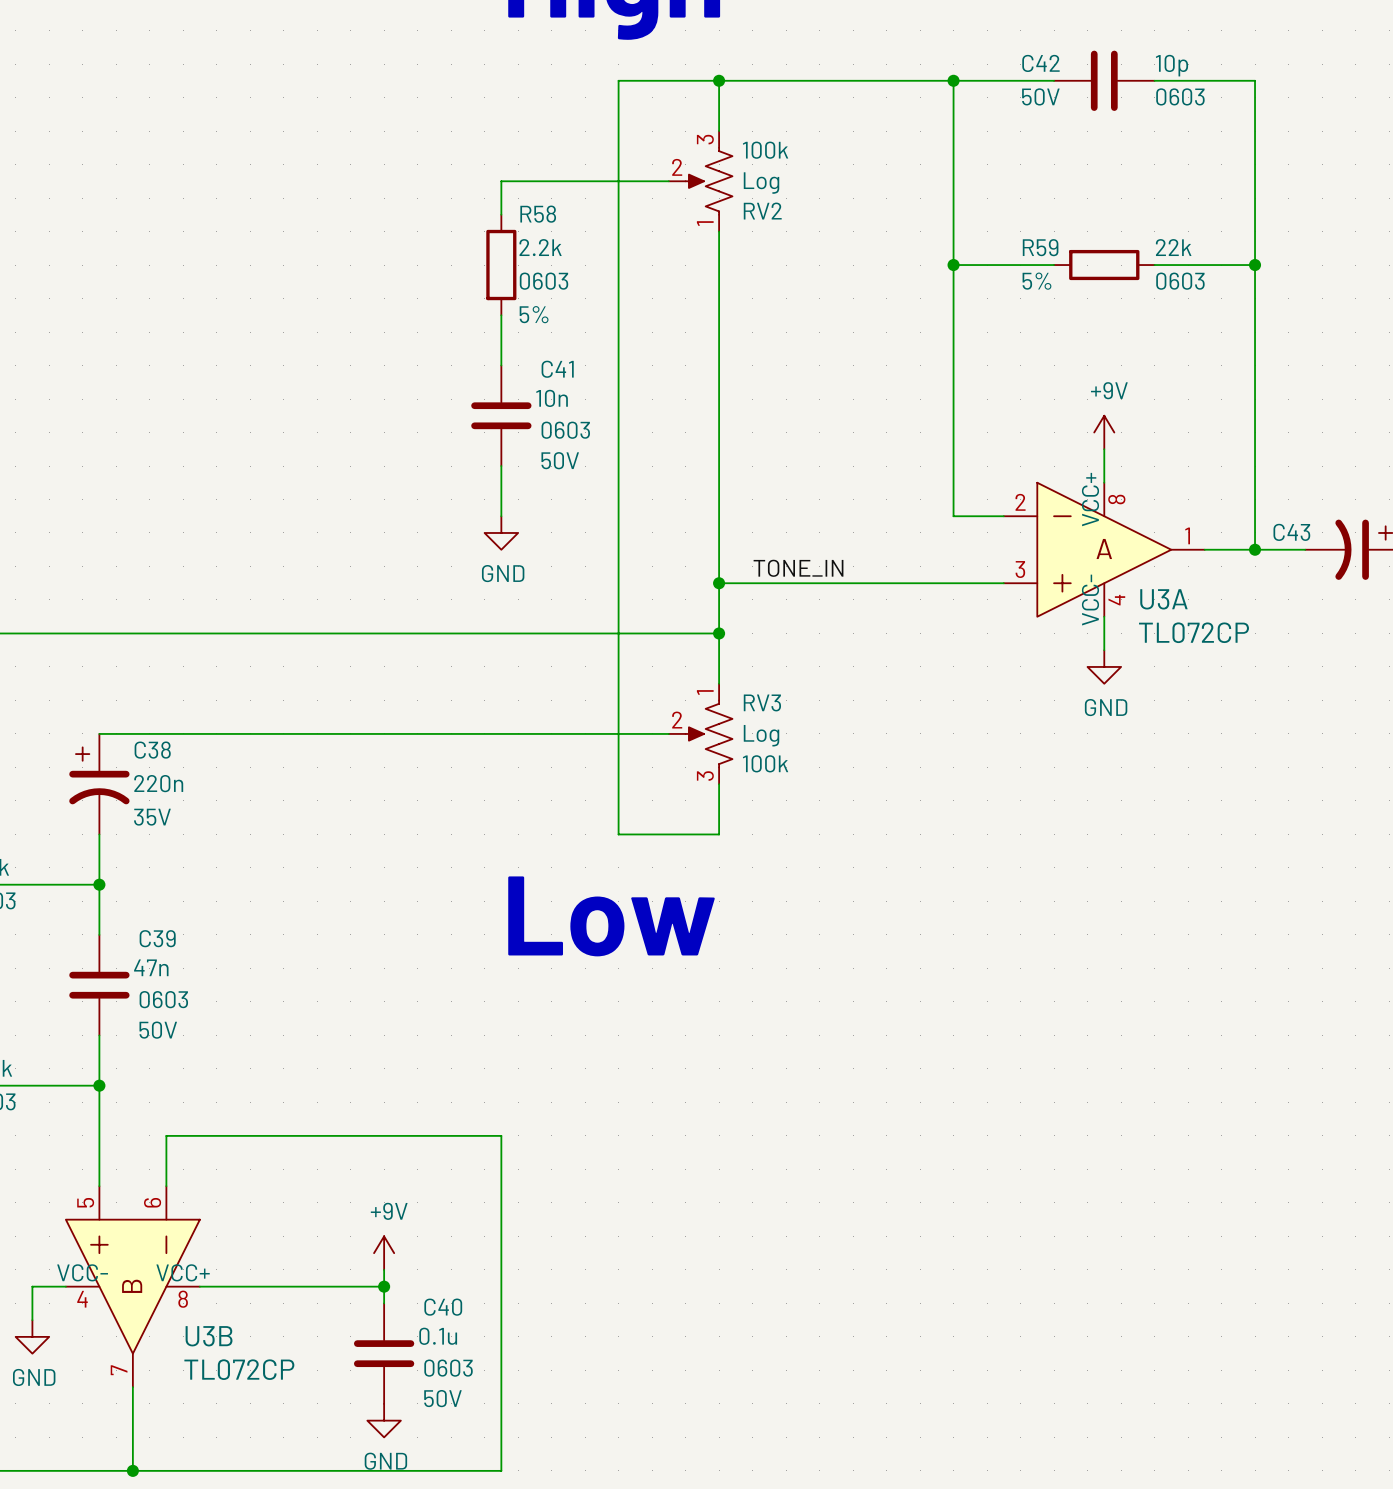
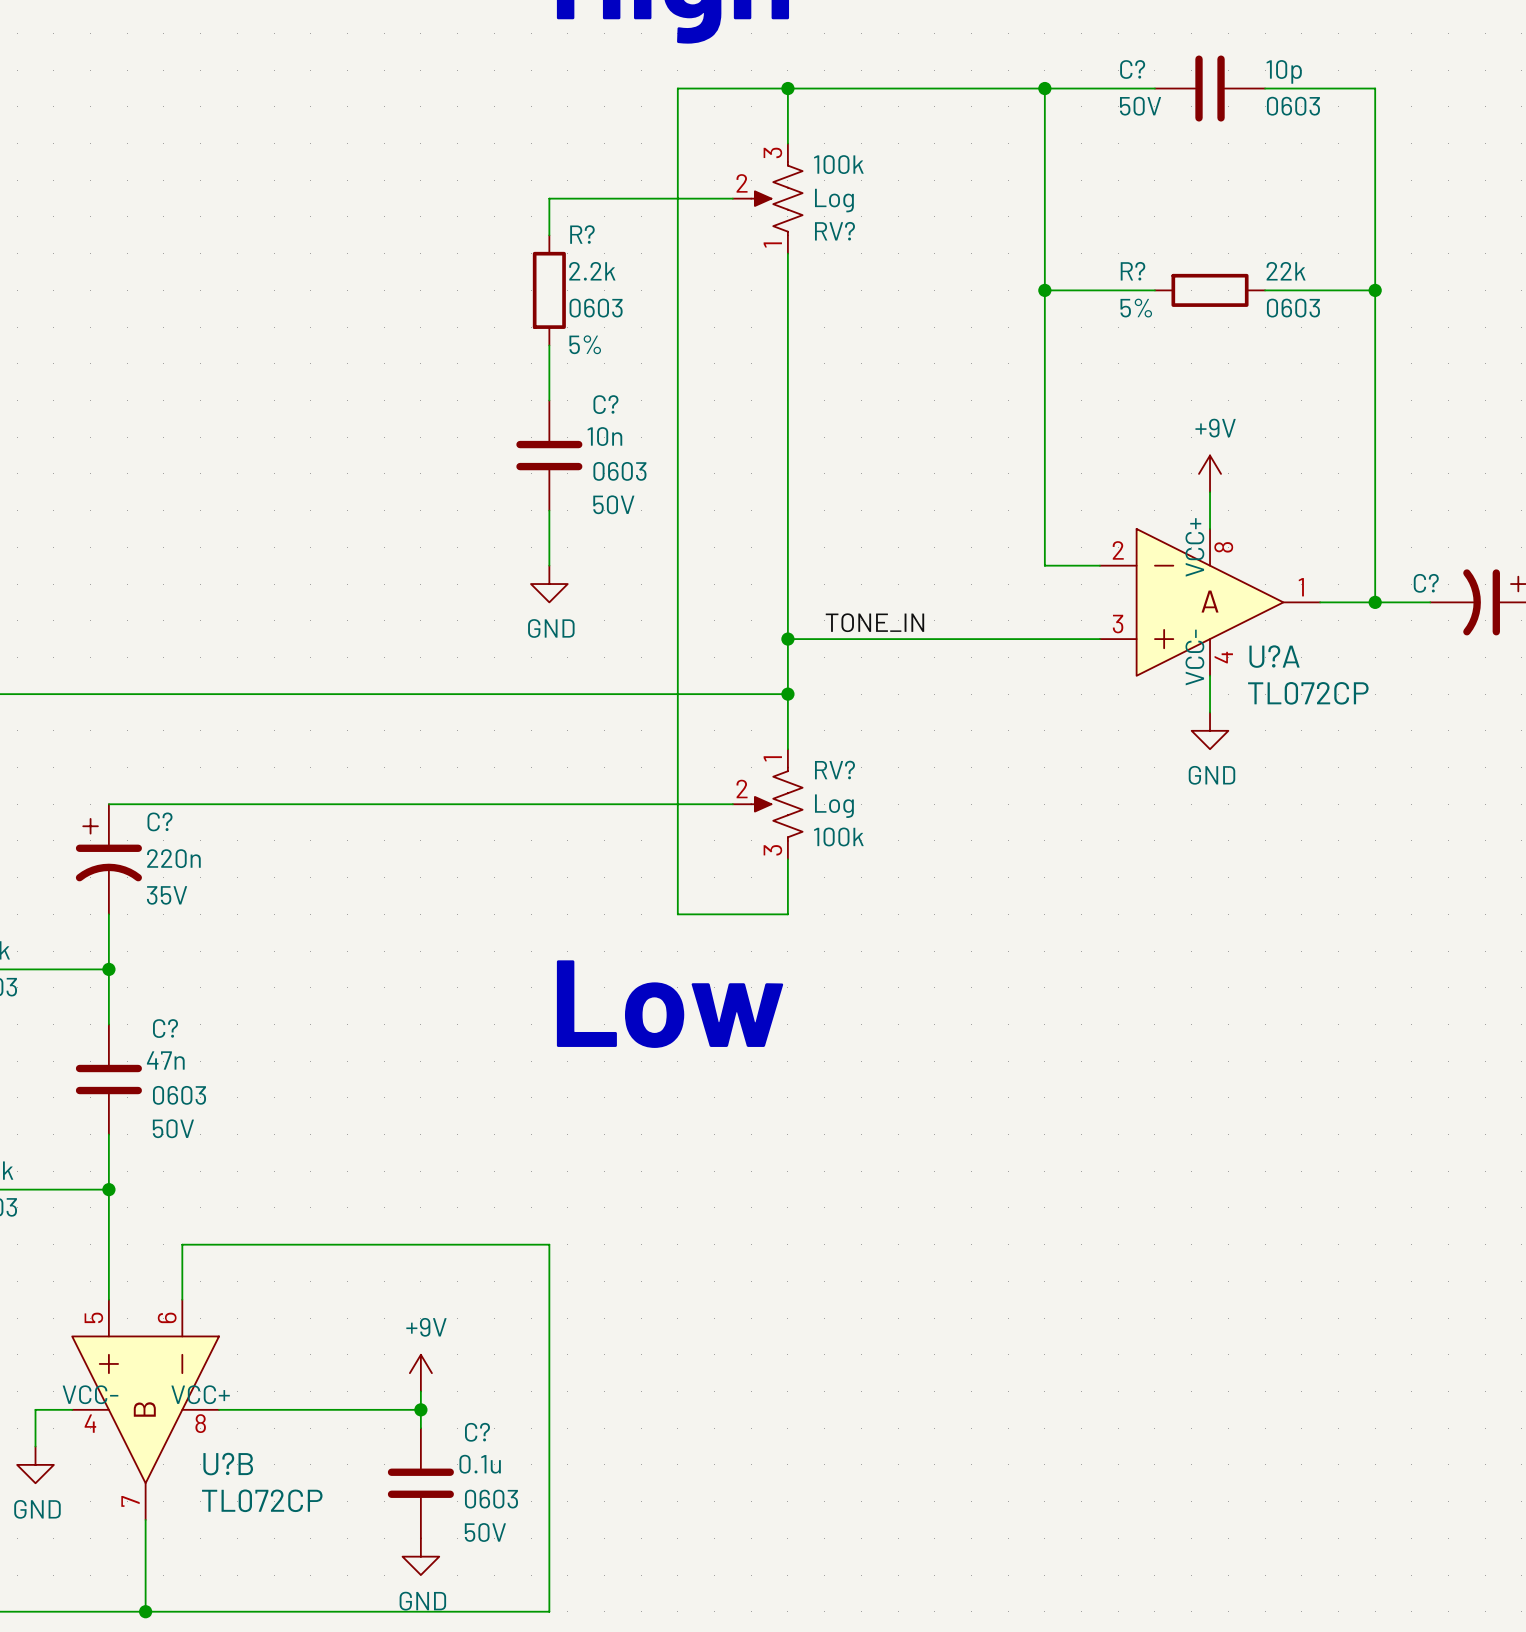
C42 name: C42 (1040, 63) -> C? (1132, 69)
RV2 name: RV2 (762, 211) -> RV? (834, 231)
R58 name: R58 (538, 214) -> R? (582, 234)
R59 name: R59 (1040, 247) -> R? (1132, 271)
C41 name: C41 (557, 369) -> C? (605, 404)
C43 name: C43 (1291, 532) -> C? (1426, 583)
U3A name: U3A (1163, 599) -> U?A (1274, 656)
RV3 name: RV3 (762, 702) -> RV? (834, 770)
C38 name: C38 (152, 750) -> C? (160, 821)
C39 name: C39 (157, 938) -> C? (165, 1028)
C40 name: C40 (443, 1307) -> C? (477, 1432)
U3B name: U3B (209, 1336) -> U?B (228, 1464)

